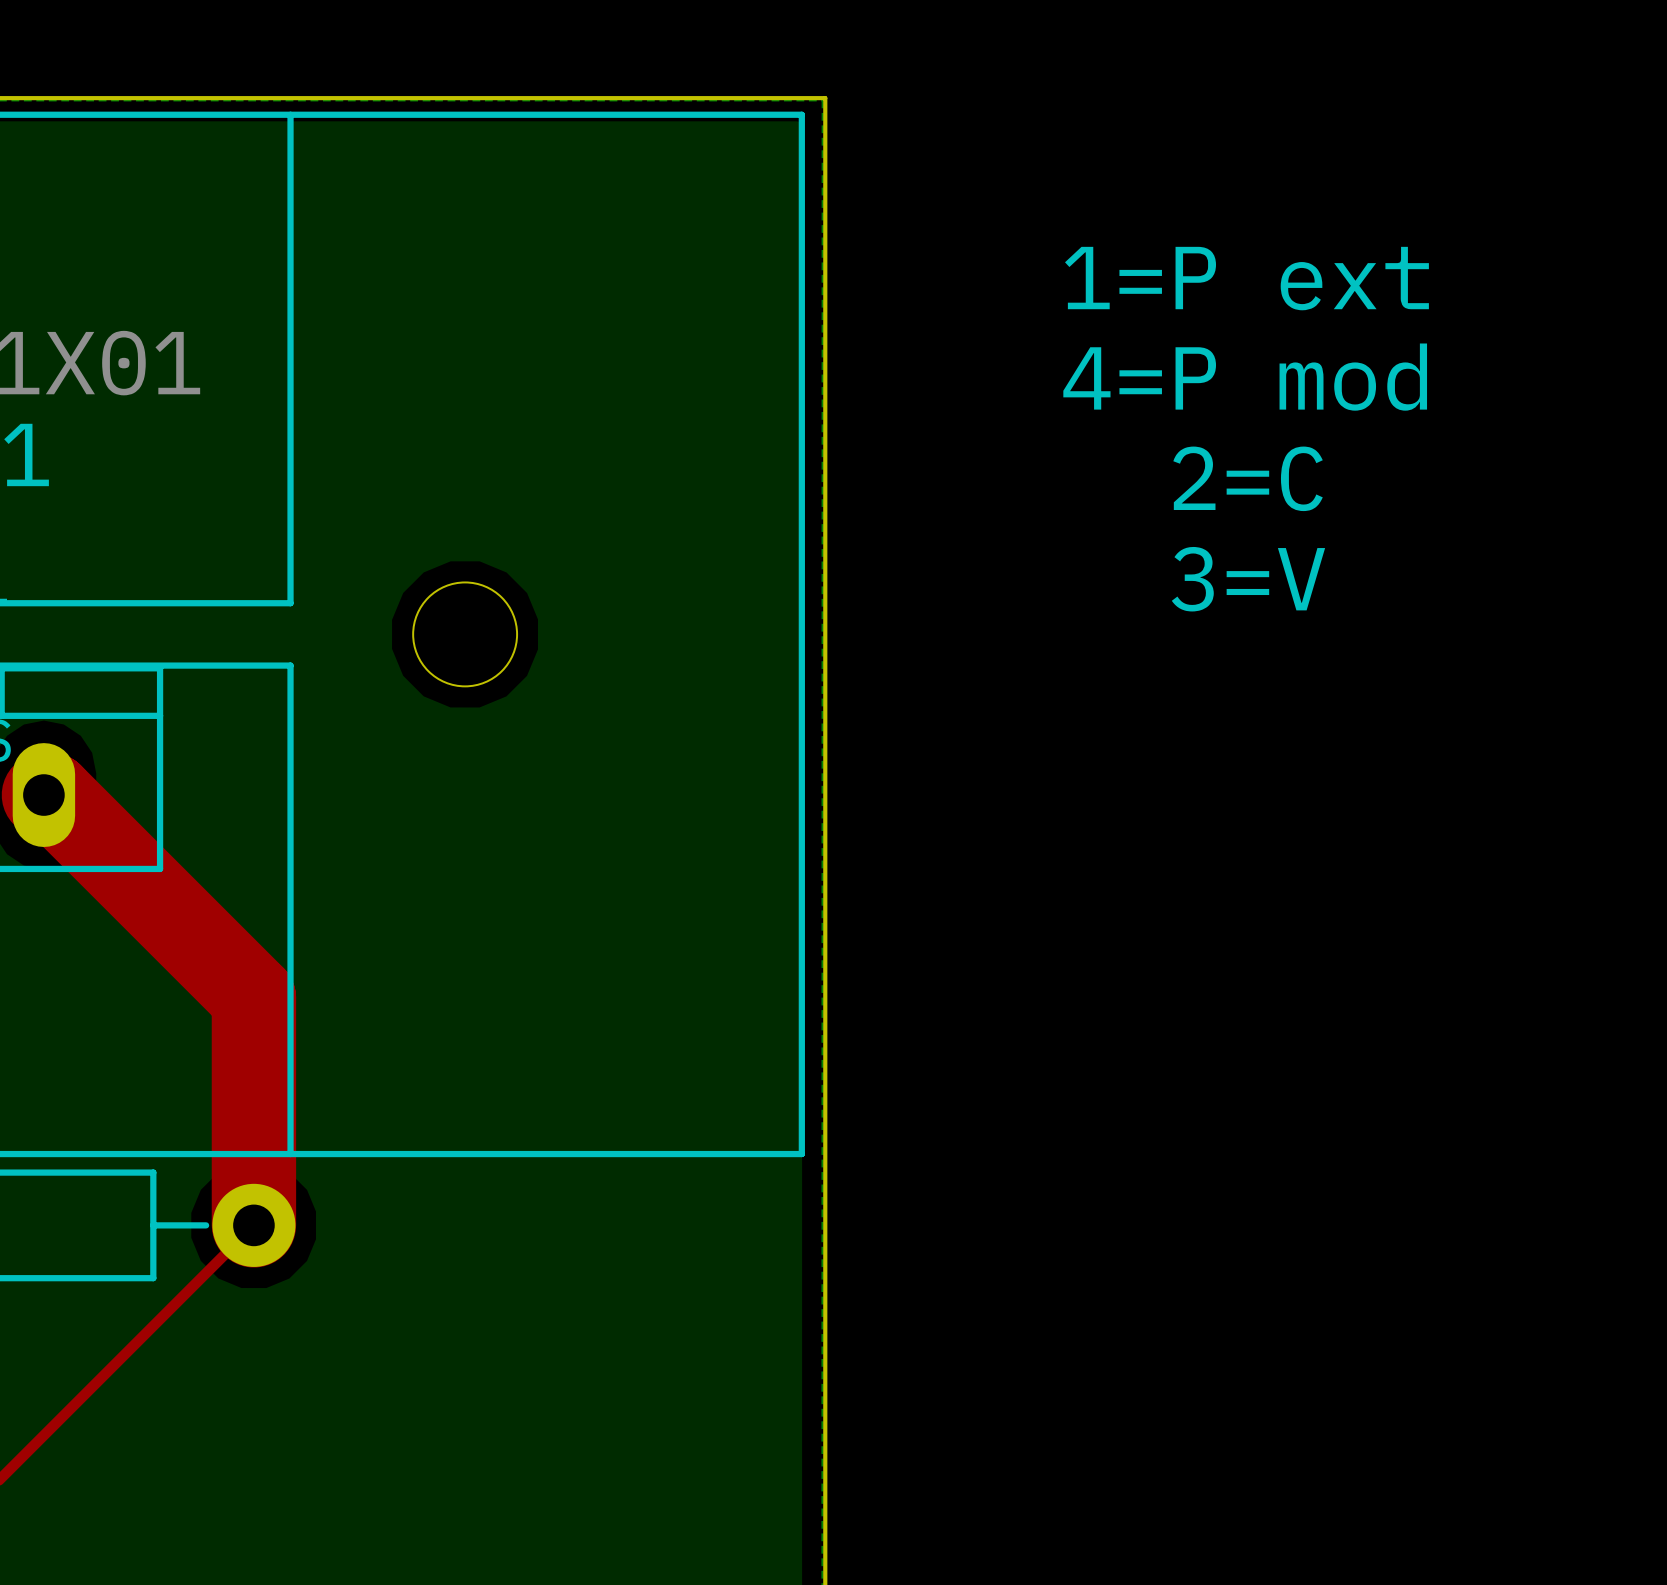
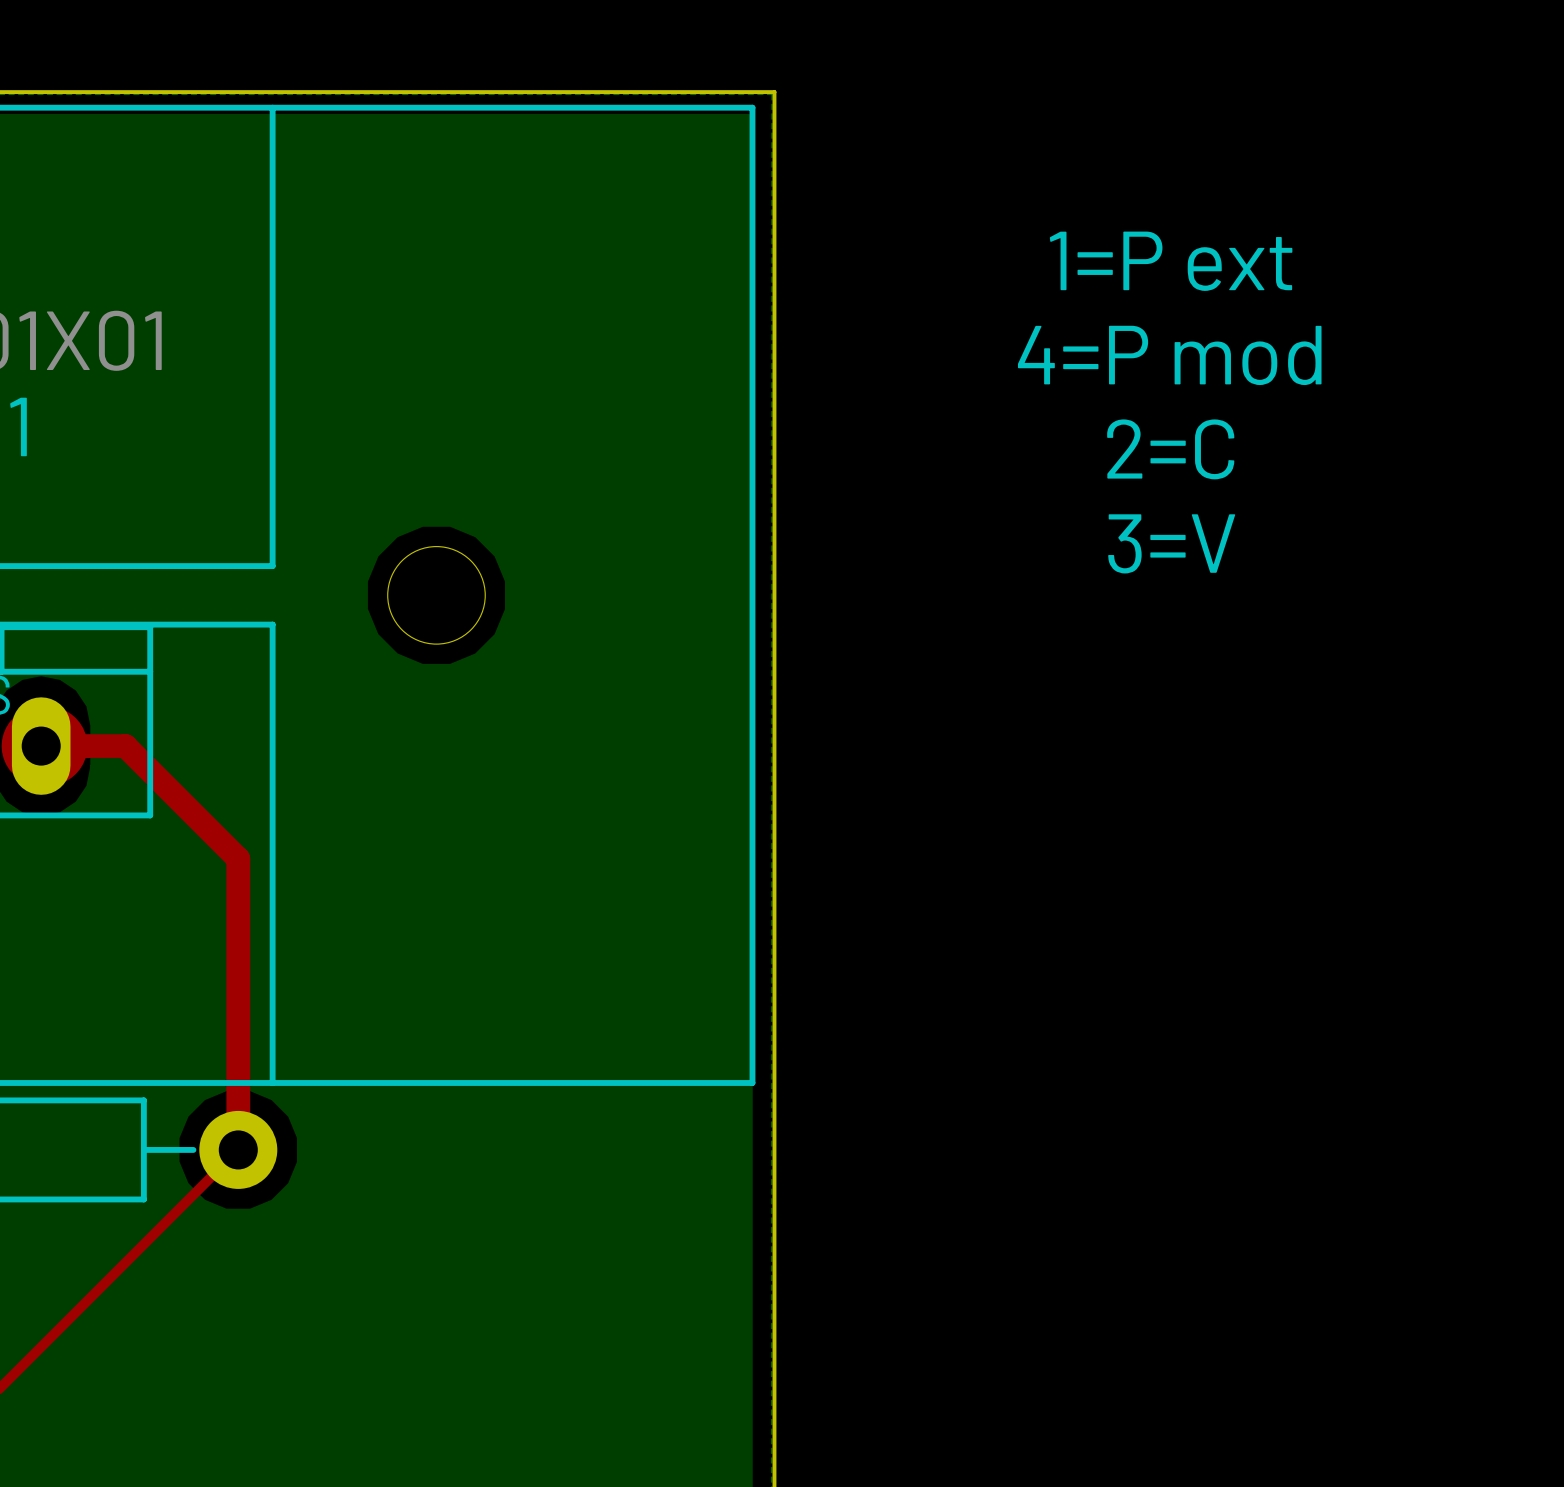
top track: (50, 795) (253, 997) -> (41, 746) (125, 746) (238, 858) (238, 936)
top track width: thick (253, 997) (253, 1225) -> thin (238, 936) (238, 1149)

